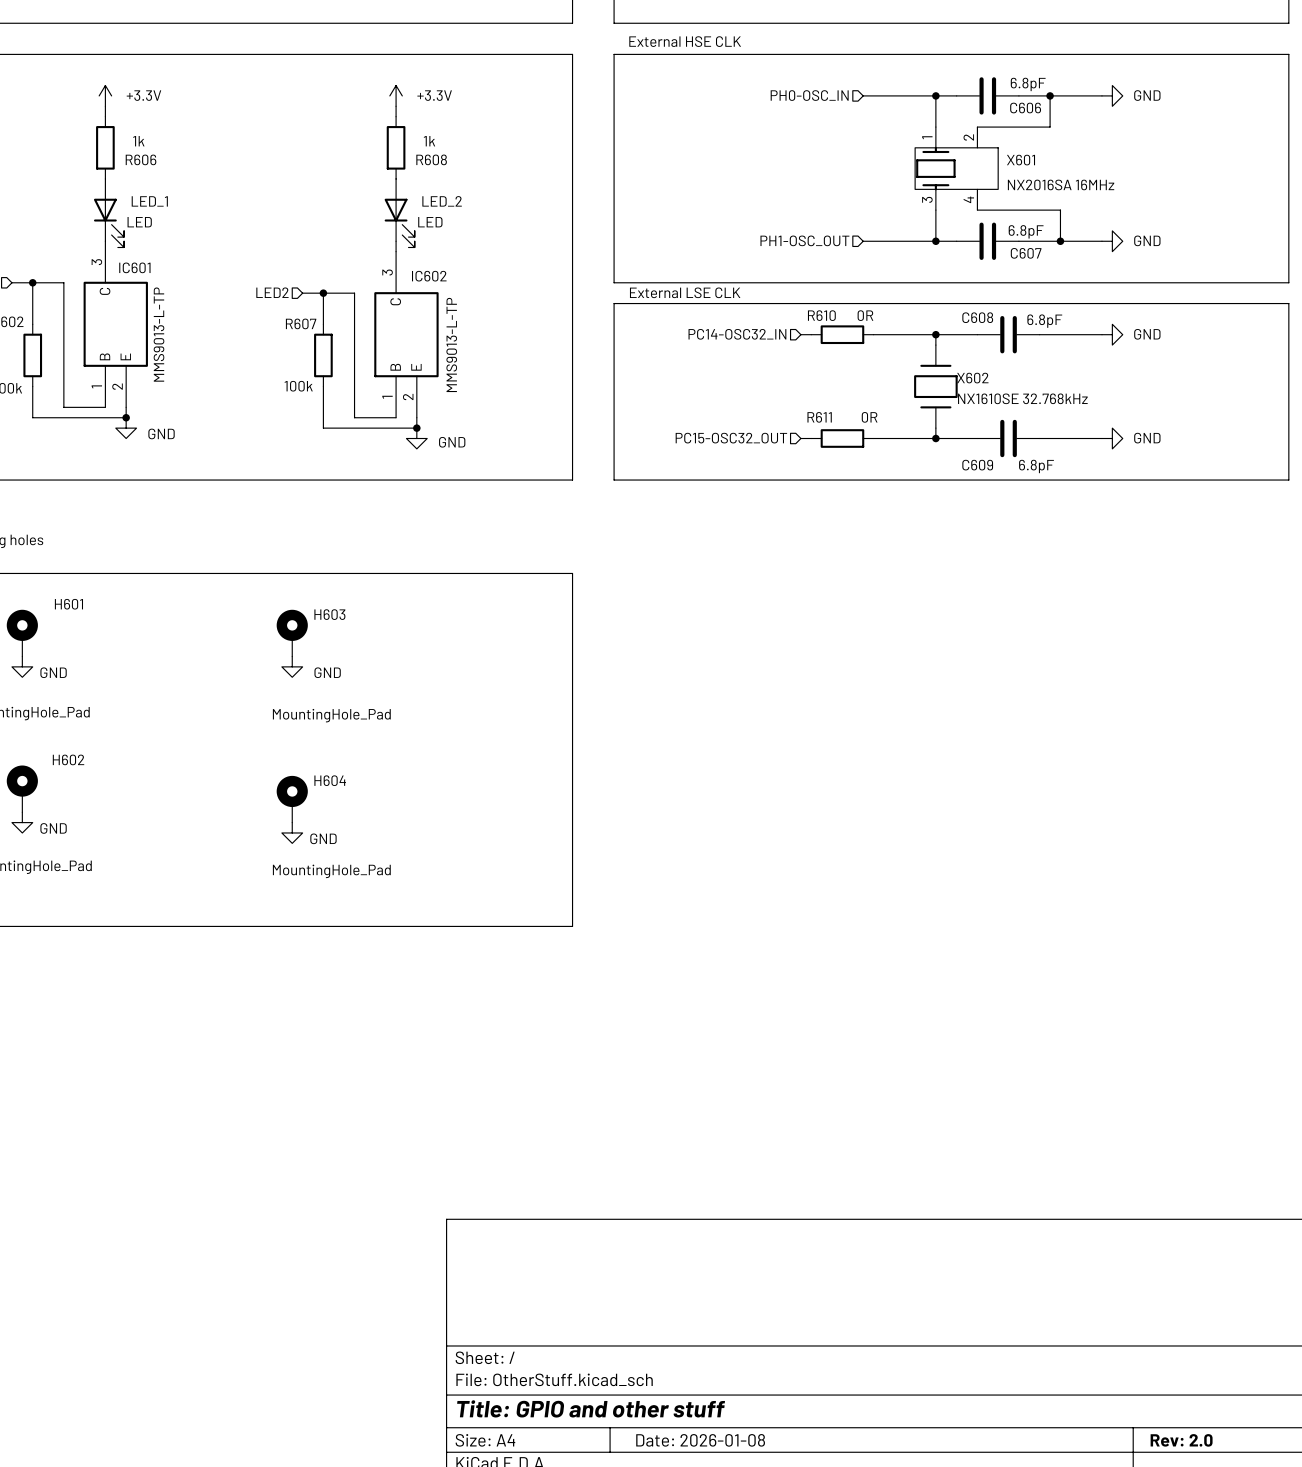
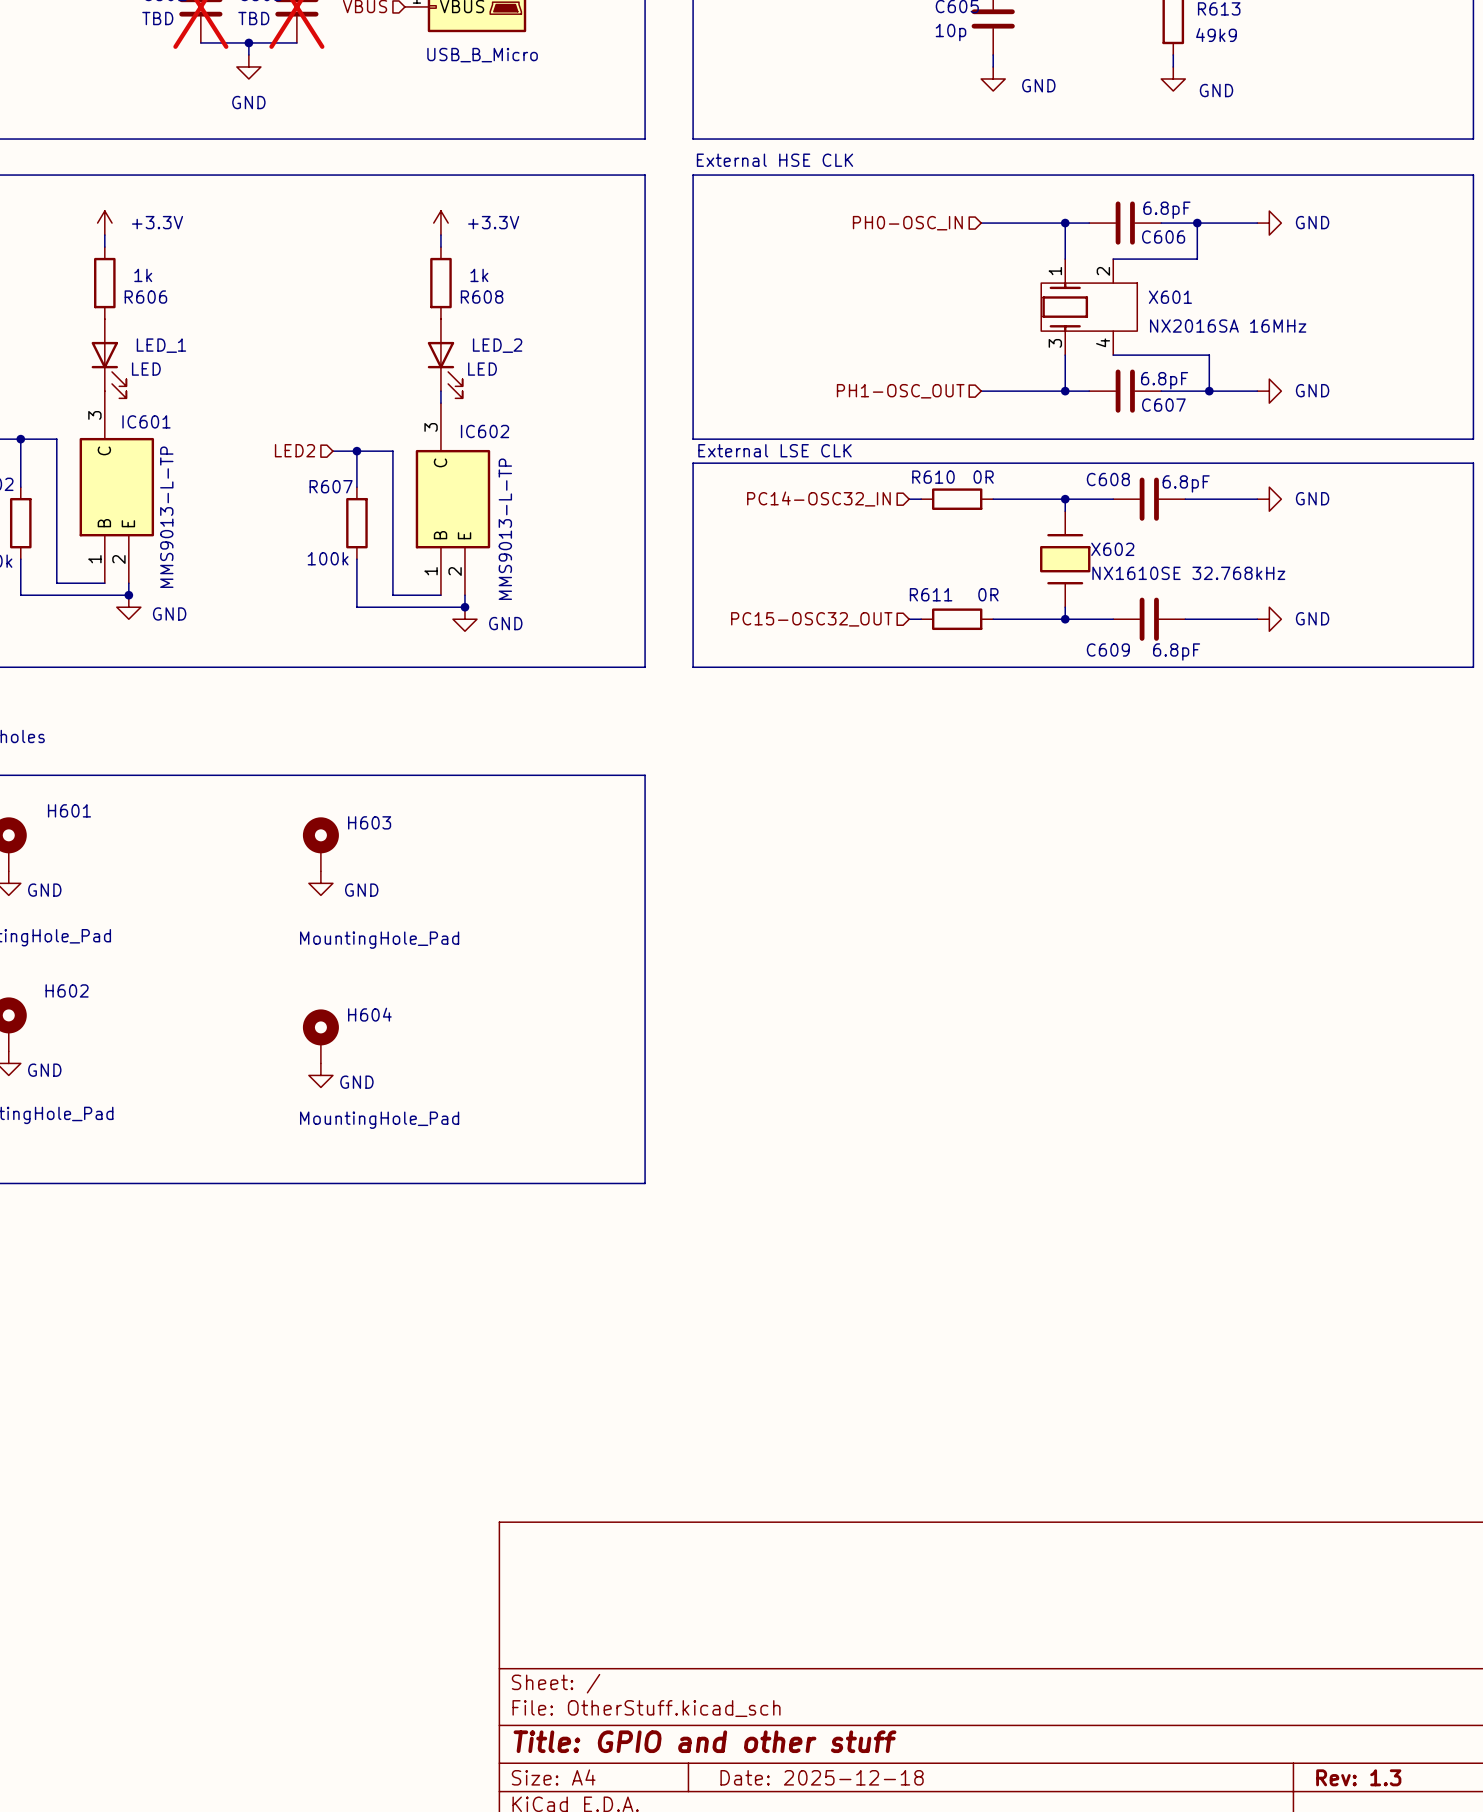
title block: Date: 2026-01-08 (700, 1440) -> Date: 2025-12-18 (822, 1777)
title block: Rev: 2.0 (1181, 1440) -> Rev: 1.3 (1358, 1777)

